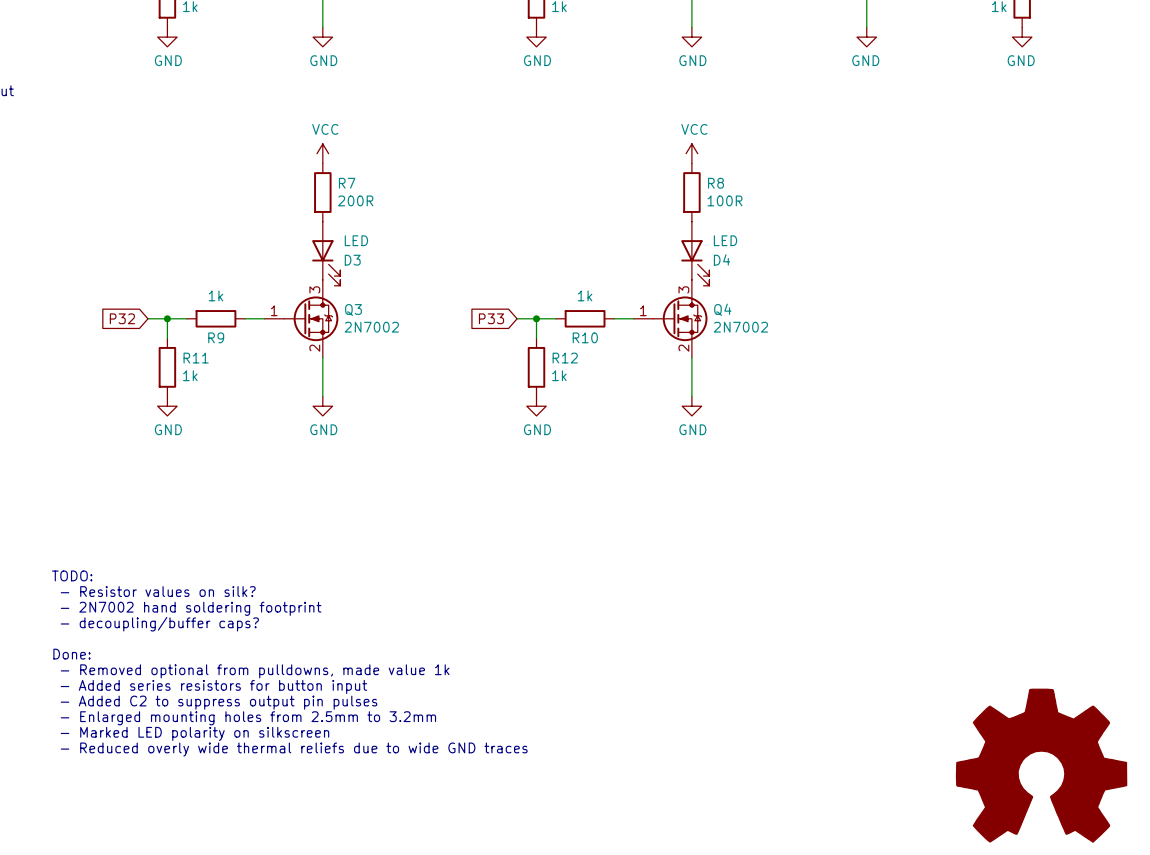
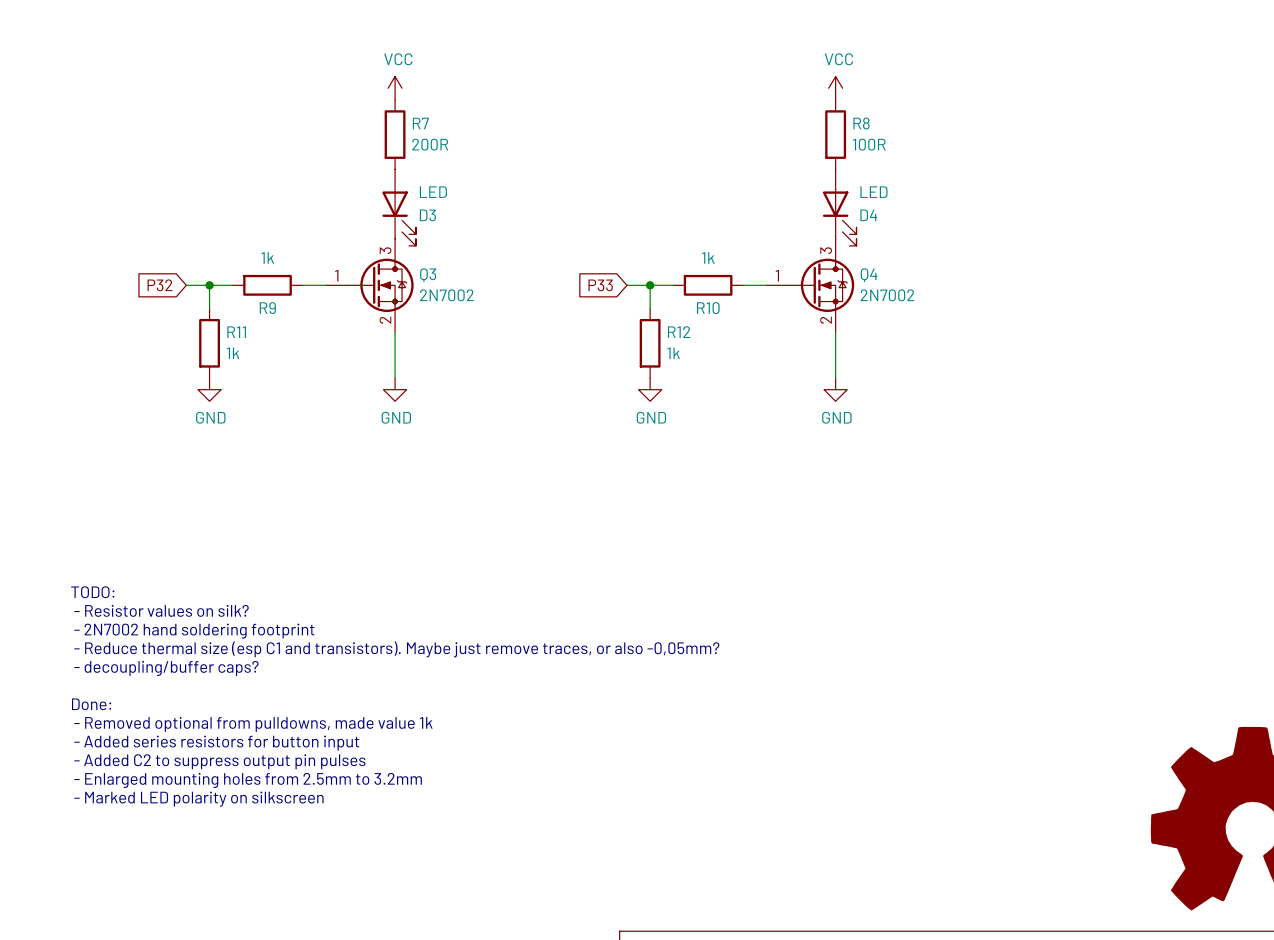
text: - decoupling/buffer caps? (159, 624) -> - Reduce thermal size (esp C1 and transistors). Maybe just remove traces, or also -0,05mm? (396, 649)
text: none -> - decoupling/buffer caps? (166, 668)
text: Done: (71, 654) -> none
text: - Removed optional from pulldowns, made value 1k (255, 671) -> Done: (91, 704)
text: - Added series resistors for button input (213, 687) -> - Removed optional from pulldowns, made value 1k (253, 724)
text: - Added C2 to suppress output pin pulses (219, 702) -> - Added series resistors for button input (216, 743)
text: - Enlarged mounting holes from 2.5mm to 3.2mm (248, 718) -> - Added C2 to suppress output pin pulses (219, 761)
text: - Marked LED polarity on silkscreen (195, 733) -> - Enlarged mounting holes from 2.5mm to 3.2mm (248, 780)
text: - Reduced overly wide thermal reliefs due to wide GND traces (294, 749) -> - Marked LED polarity on silkscreen (198, 799)

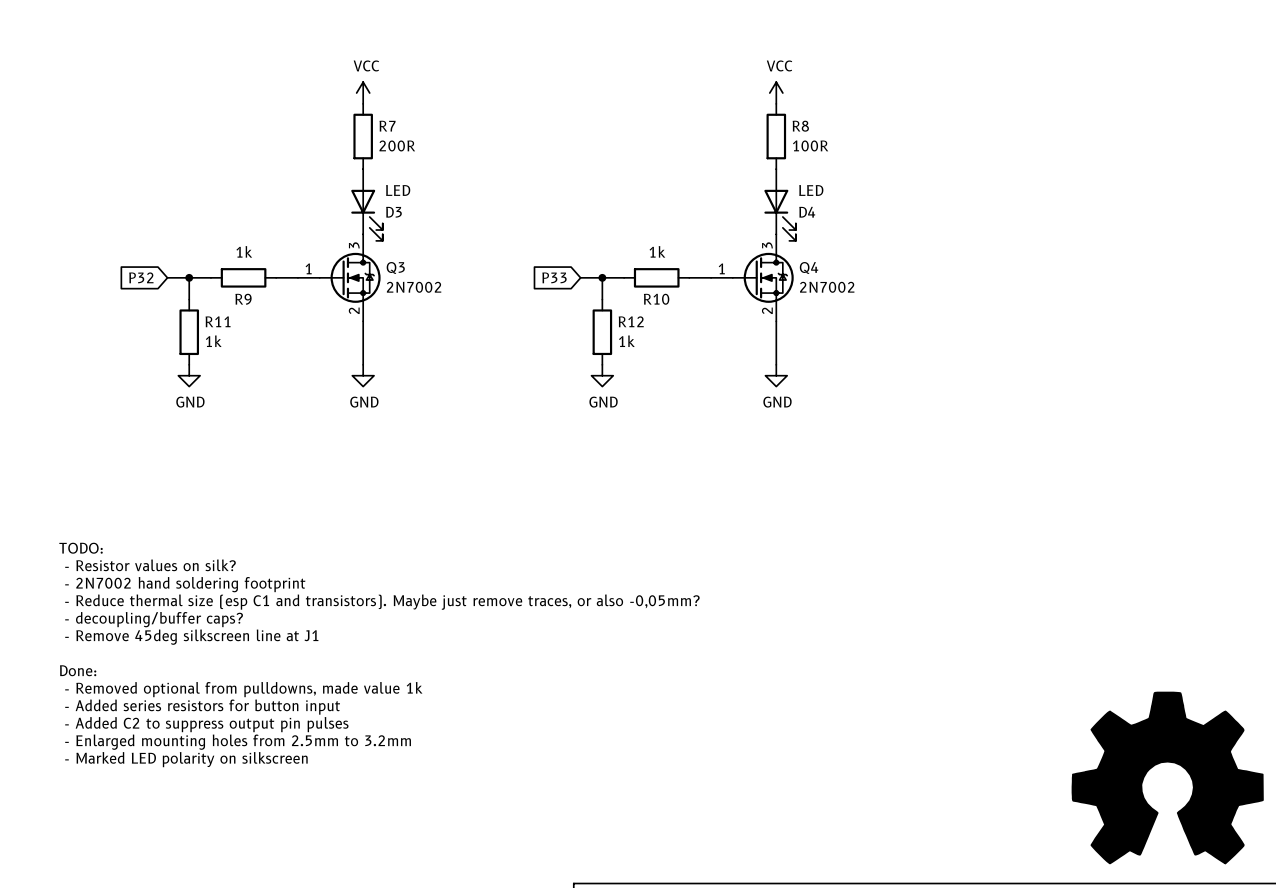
text: none -> TODO: (81, 548)
text: TODO: (92, 592) -> - Resistor values on silk? (150, 565)
text: - Resistor values on silk? (161, 610) -> - 2N7002 hand soldering footprint (185, 584)
text: - 2N7002 hand soldering footprint (194, 631) -> - Reduce thermal size (esp C1 and transistors). Maybe just remove traces, or also -0,05mm? (382, 602)
text: - Reduce thermal size (esp C1 and transistors). Maybe just remove traces, or also -0,05mm? (396, 649) -> - decoupling/buffer caps? (154, 619)
text: - decoupling/buffer caps? (166, 668) -> - Remove 45deg silkscreen line at J1 (191, 637)

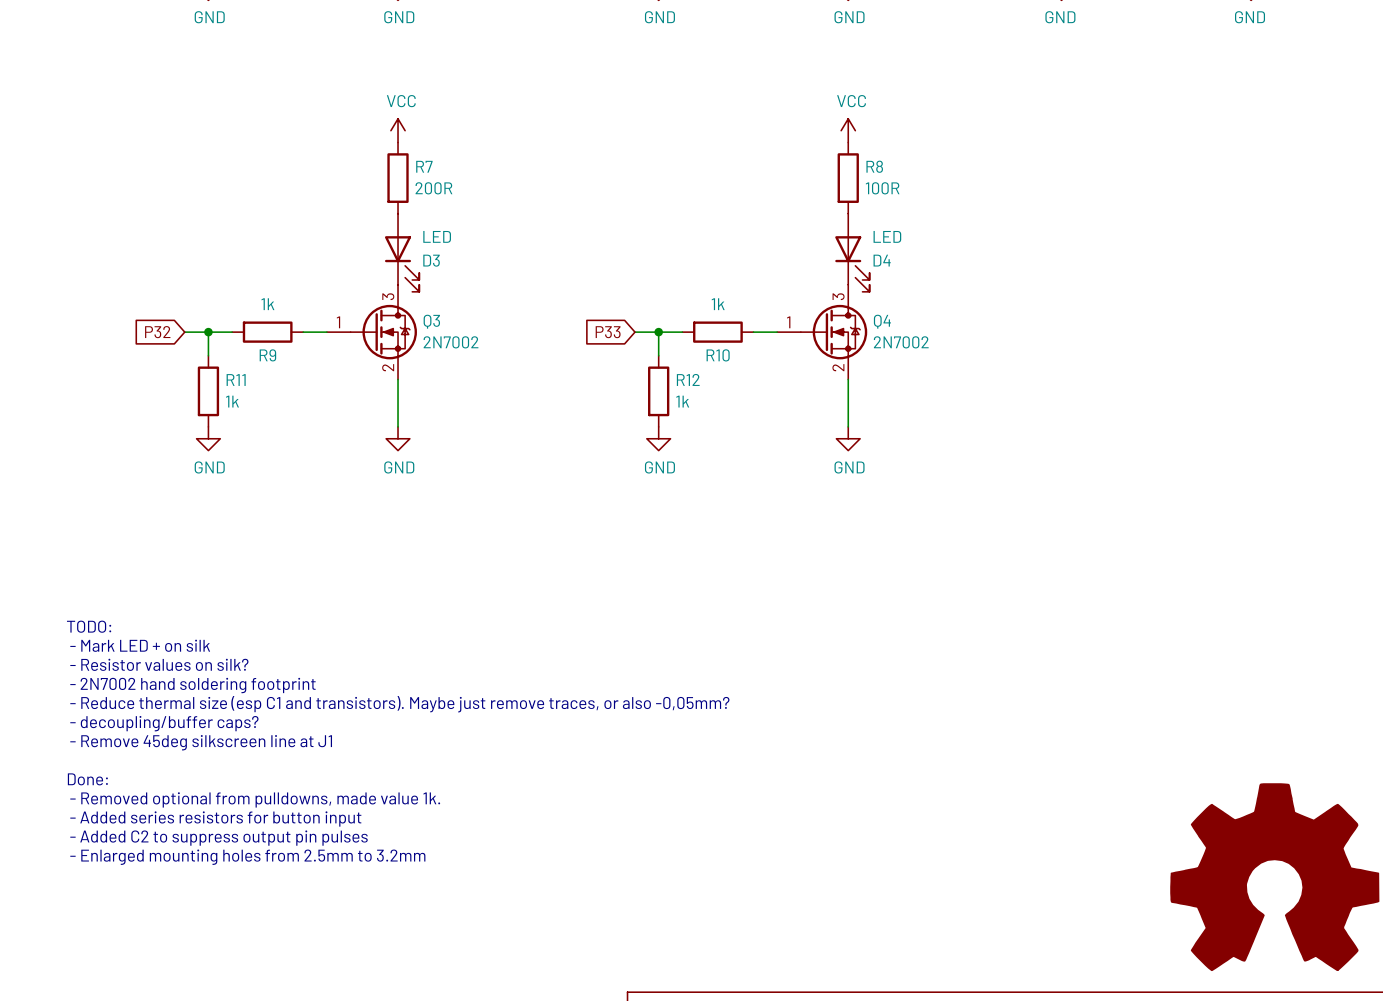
text: - Resistor values on silk? (150, 565) -> - Mark LED + on silk (140, 645)
text: - 2N7002 hand soldering footprint (185, 584) -> - Resistor values on silk? (159, 664)
text: - Reduce thermal size (esp C1 and transistors). Maybe just remove traces, or also -0,05mm? (382, 602) -> - 2N7002 hand soldering footprint (192, 685)
text: - decoupling/buffer caps? (154, 619) -> - Reduce thermal size (esp C1 and transistors). Maybe just remove traces, or also -0,05mm? (399, 704)
text: - Remove 45deg silkscreen line at J1 (191, 637) -> - decoupling/buffer caps? (164, 723)
text: none -> - Remove 45deg silkscreen line at J1 (201, 742)
text: Done: (78, 670) -> none
text: - Removed optional from pulldowns, made value 1k (243, 689) -> Done: (87, 779)
text: - Added series resistors for button input (202, 707) -> - Removed optional from pulldowns, made value 1k. (255, 799)
text: - Added C2 to suppress output pin pulses (206, 724) -> - Added series resistors for button input (215, 819)
text: - Enlarged mounting holes from 2.5mm to 3.2mm (238, 742) -> - Added C2 to suppress output pin pulses (219, 838)
text: - Marked LED polarity on silkscreen (186, 759) -> - Enlarged mounting holes from 2.5mm to 3.2mm (247, 857)

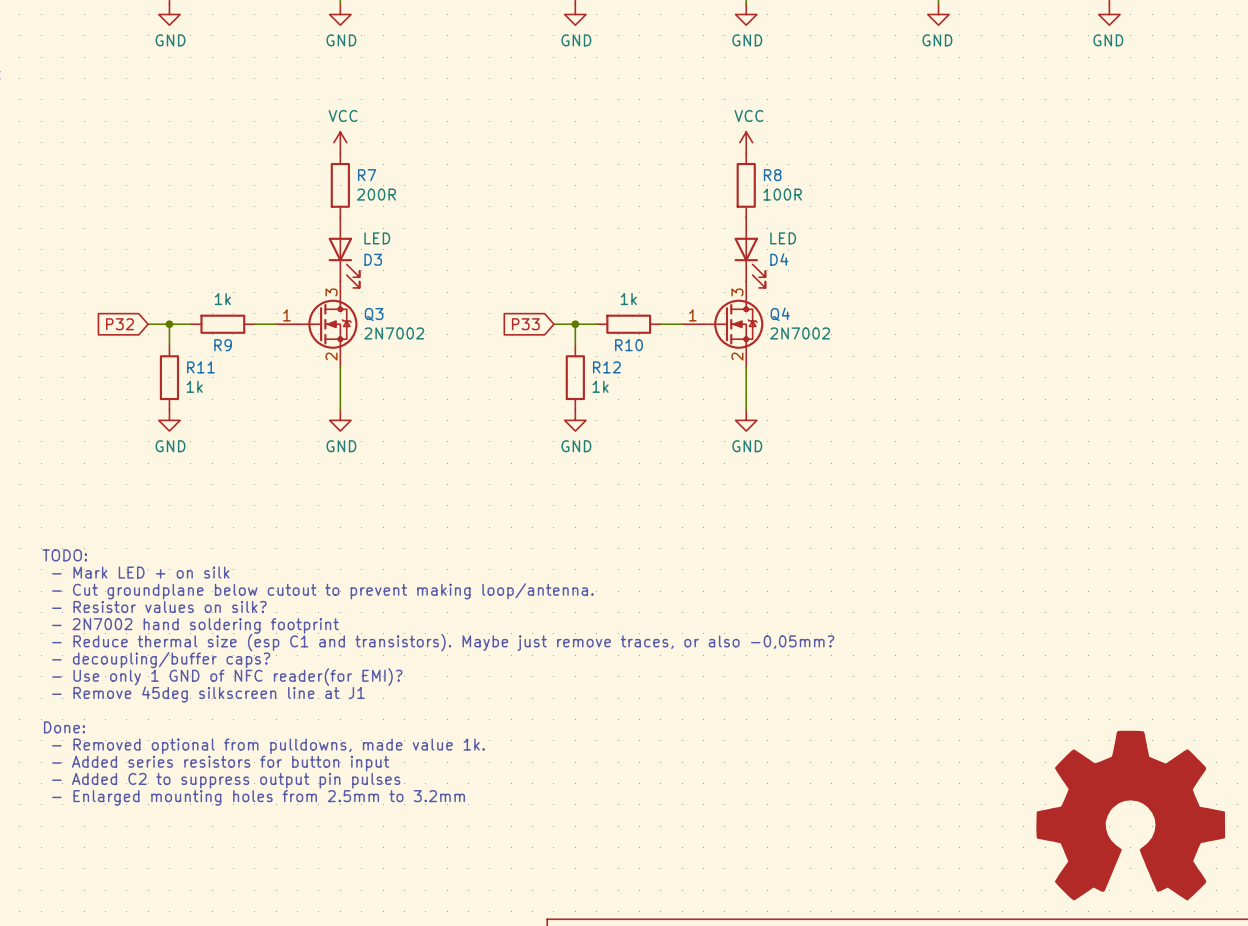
text: none -> TODO: (64, 555)
text: none -> - Mark LED + on silk (140, 572)
text: TODO: (89, 626) -> - Cut groundplane below cutout to prevent making loop/antenna. (322, 591)
text: - Mark LED + on silk (140, 645) -> - Resistor values on silk? (159, 606)
text: - Resistor values on silk? (159, 664) -> - 2N7002 hand soldering footprint (195, 625)
text: - 2N7002 hand soldering footprint (192, 685) -> - Reduce thermal size (esp C1 and transistors). Maybe just remove traces, or also -0,05mm? (443, 642)
text: - Reduce thermal size (esp C1 and transistors). Maybe just remove traces, or also -0,05mm? (399, 704) -> - decoupling/buffer caps? (161, 660)
text: - decoupling/buffer caps? (164, 723) -> - Use only 1 GND of NFC reader(for EMI)? (227, 677)

